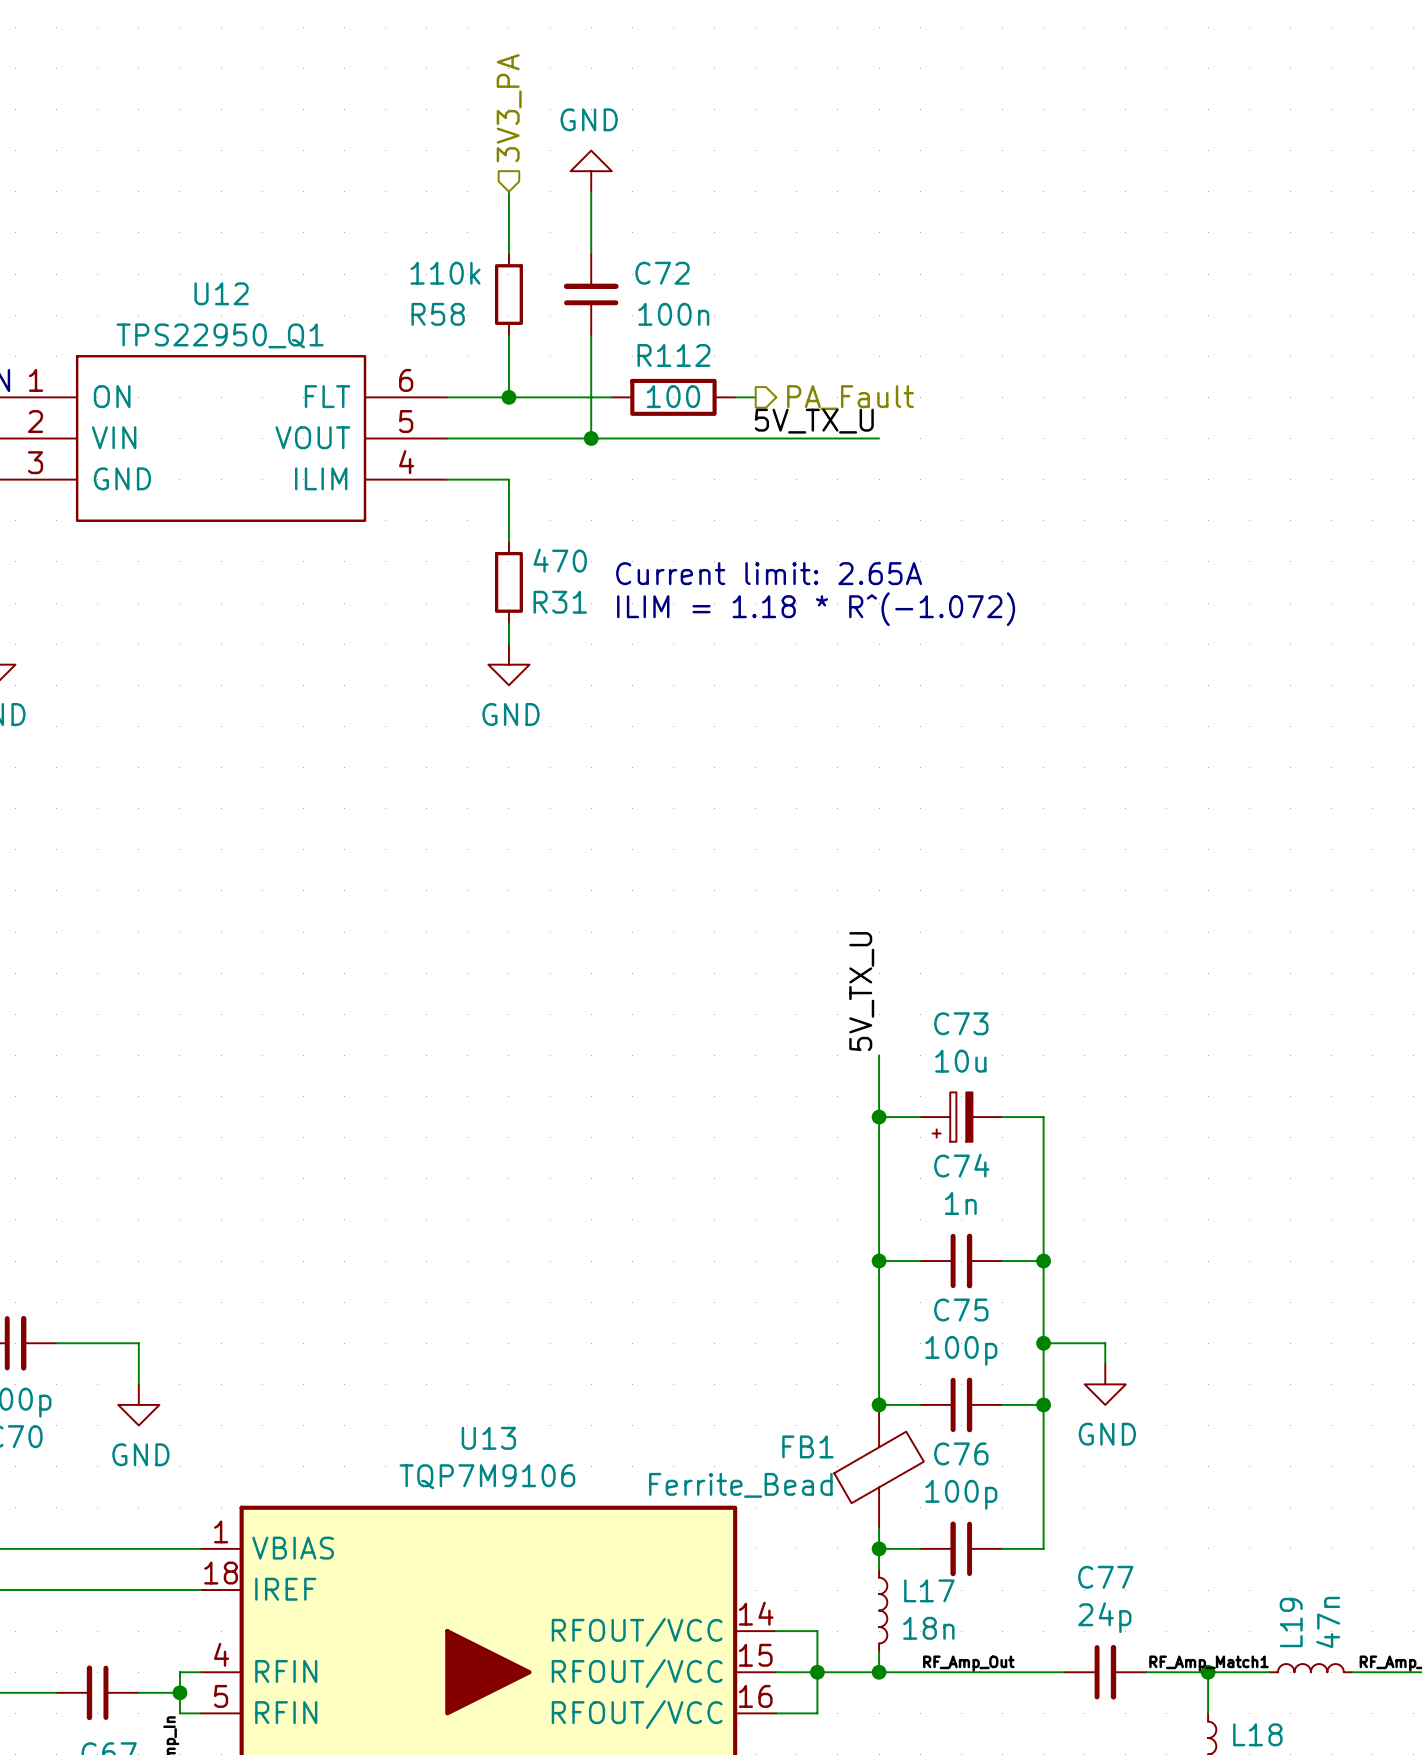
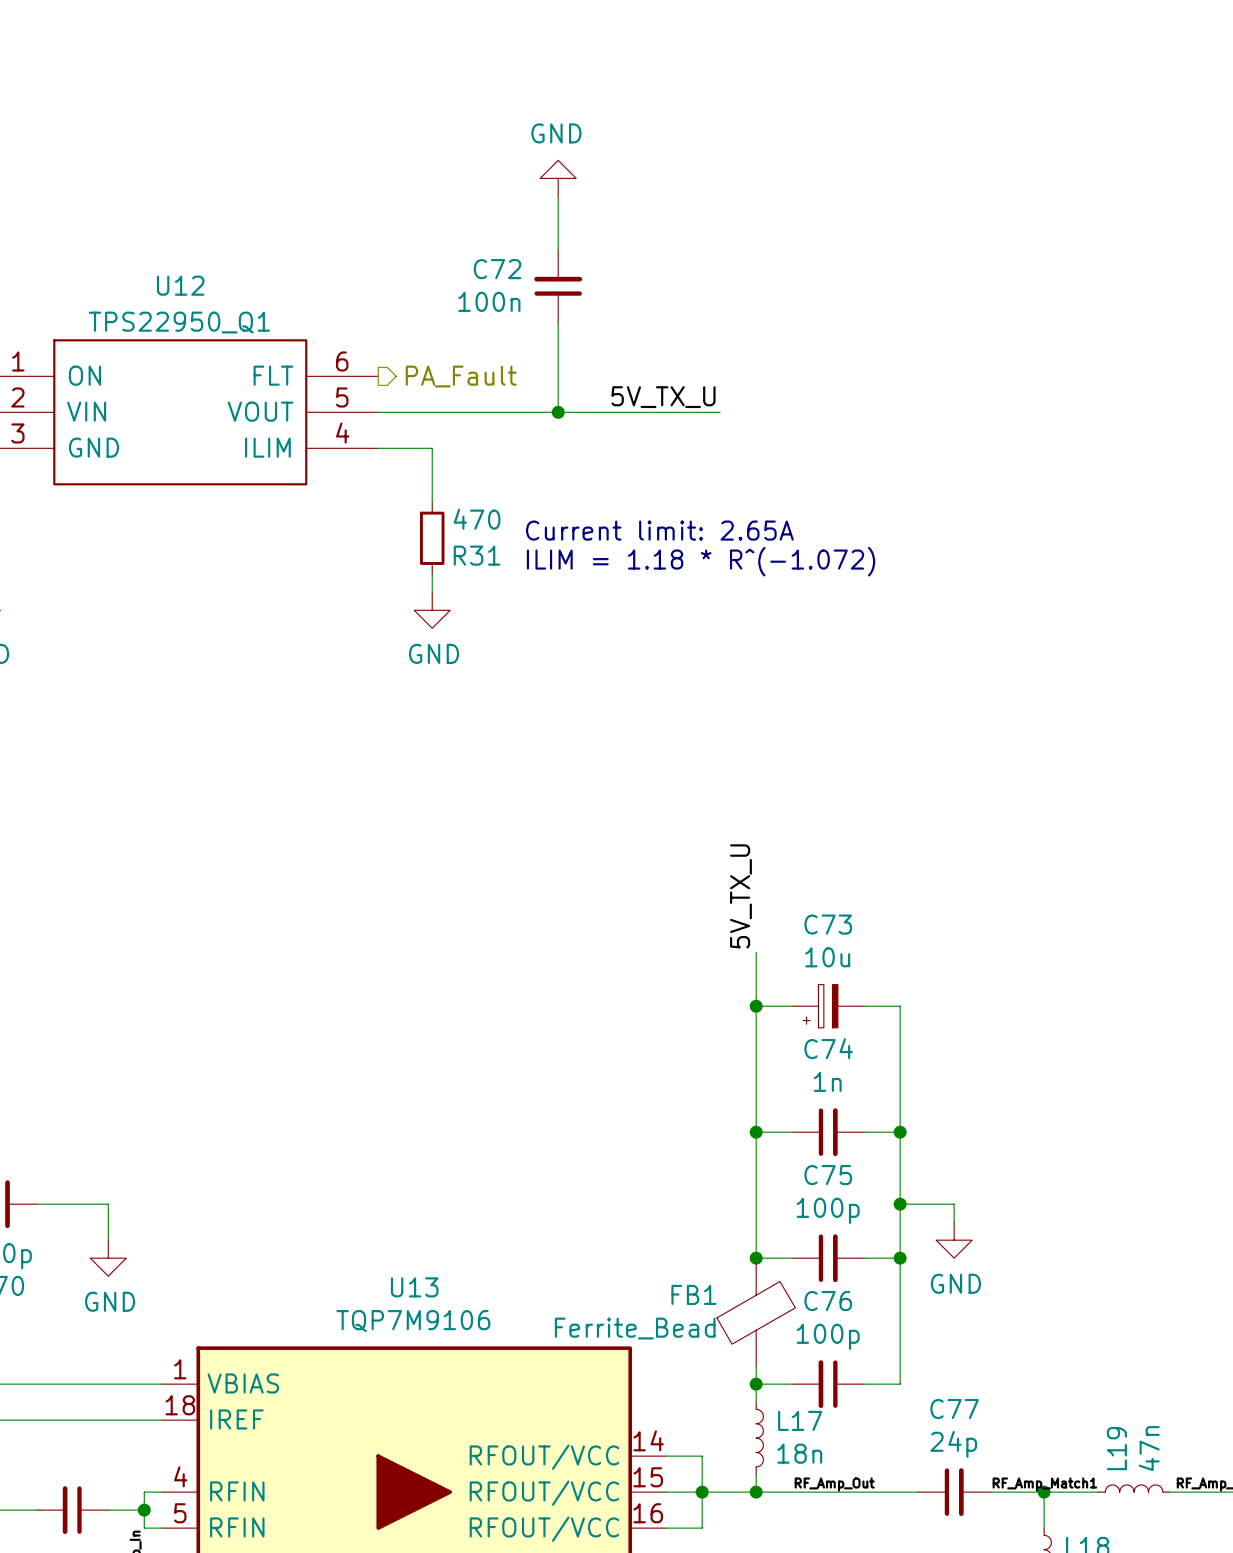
hierarchical label: 3V3_PA (509, 108) -> none
power symbol position: GND (591, 171) -> GND (558, 178)
wire: (508, 191) (508, 253) -> none
wire: (591, 191) (591, 253) -> (558, 196) (558, 250)
C72 name position: C72 (662, 273) -> C72 (497, 269)
R58: 110k (508, 294) -> none
C72 position: (591, 294) -> (558, 286)
C72 value position: 100n (673, 314) -> 100n (489, 301)
wire: (508, 335) (508, 397) -> none
wire: (591, 335) (591, 438) -> (558, 322) (558, 412)
wire: (447, 397) (611, 397) -> none
junction: (508, 397) -> none
R112: 100 (673, 397) -> none
wire: (735, 397) (755, 397) -> none
hierarchical label position: PA_Fault (850, 397) -> PA_Fault (461, 376)
label position: 5V_TX_U (814, 421) -> 5V_TX_U (663, 397)
junction position: (591, 438) -> (558, 412)
wire: (837, 438) (879, 438) -> none

